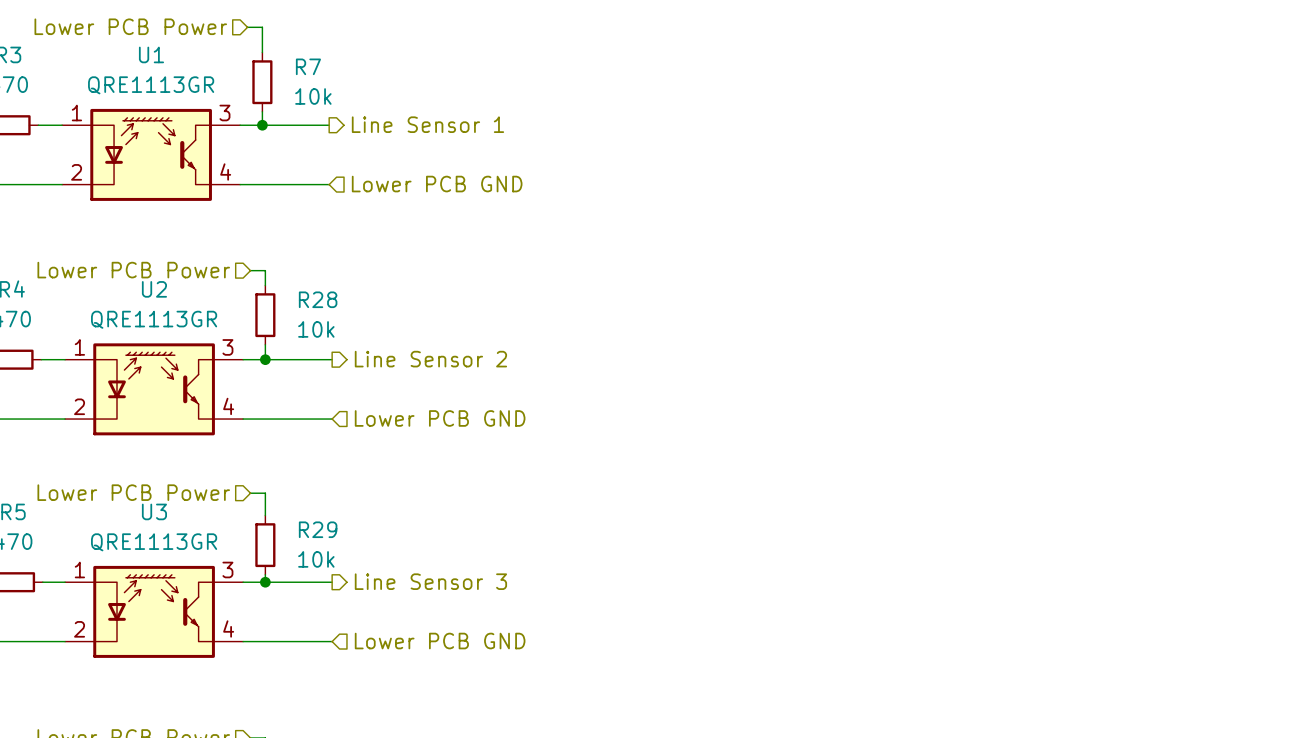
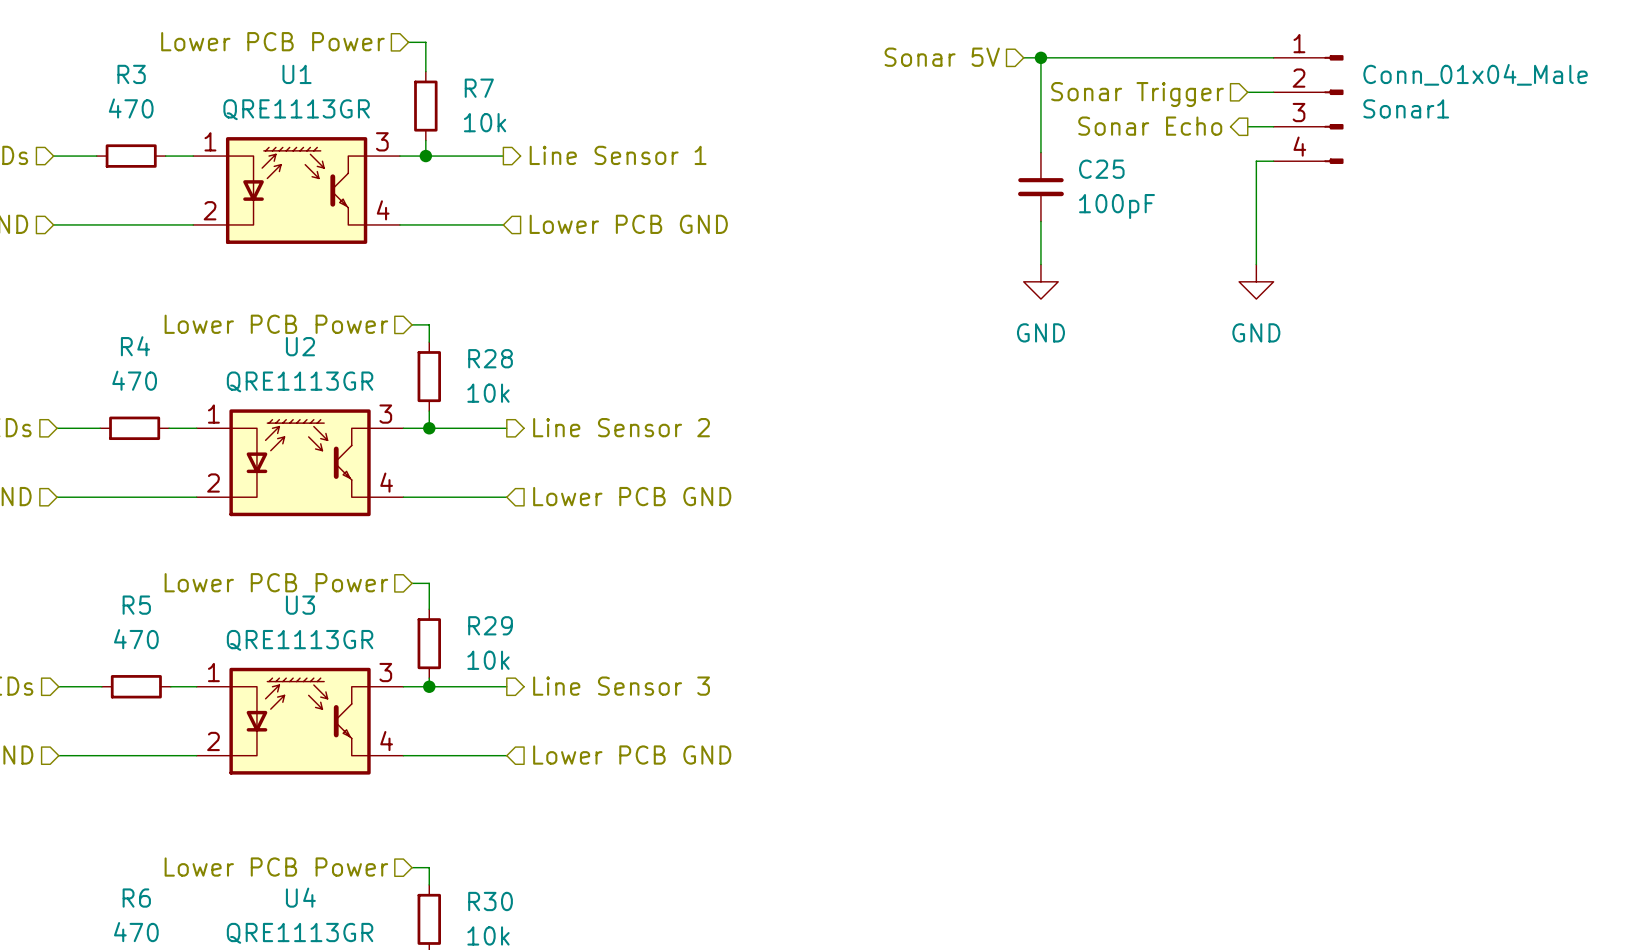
hierarchical label: none -> Sonar 5V (942, 57)
wire: none -> (1023, 57) (1273, 57)
wire: none -> (1040, 57) (1040, 152)
junction: none -> (1040, 57)
wire: none -> (1247, 92) (1273, 92)
hierarchical label: none -> Sonar Trigger (1137, 94)
Sonar1: none -> Conn_01x04_Male (1308, 109)
hierarchical label: none -> Sonar Echo (1150, 126)
wire: none -> (1247, 126) (1273, 126)
wire: none -> (1273, 161) (1256, 161) (1256, 264)
C25: none -> 100pF (1040, 187)
wire: none -> (1040, 221) (1040, 264)
power symbol: none -> GND (1040, 281)
power symbol: none -> GND (1256, 281)

